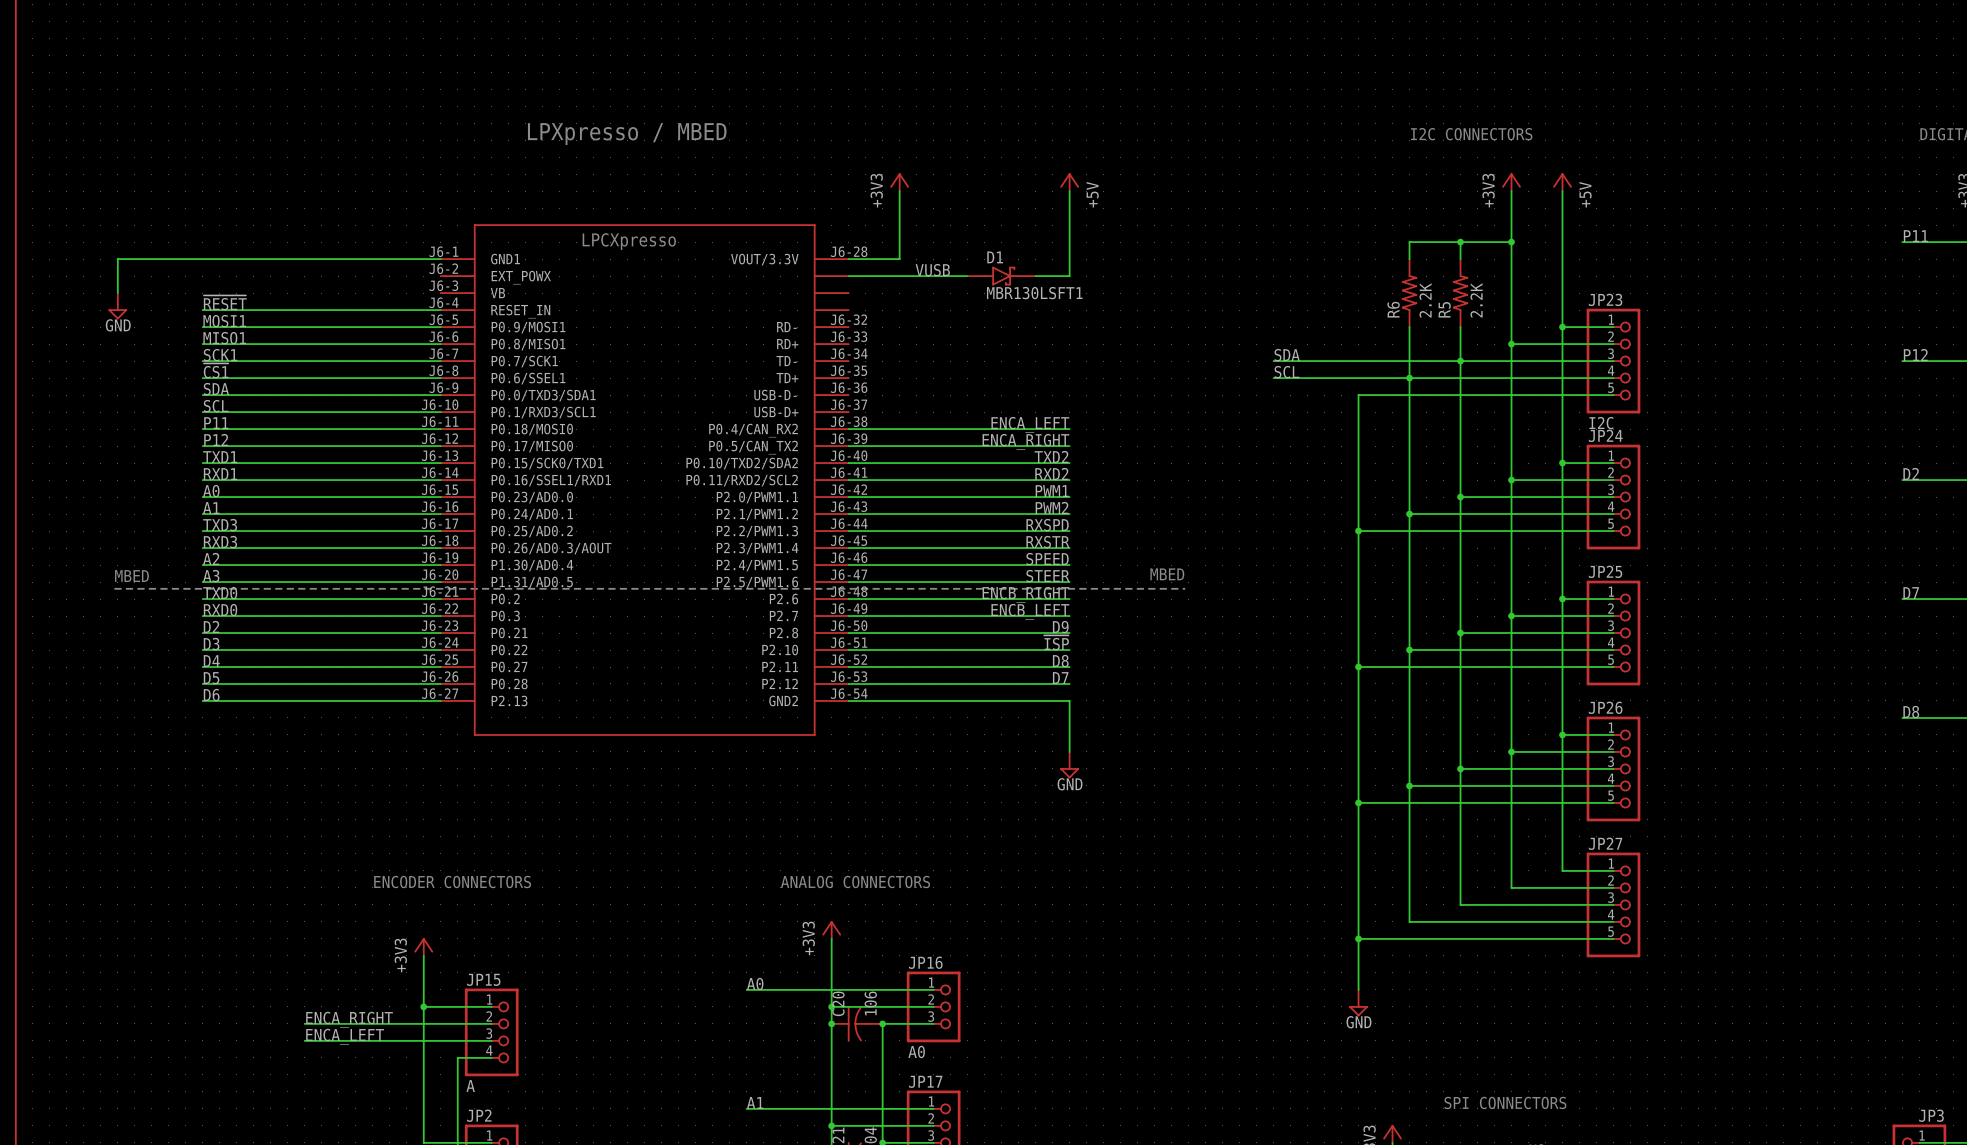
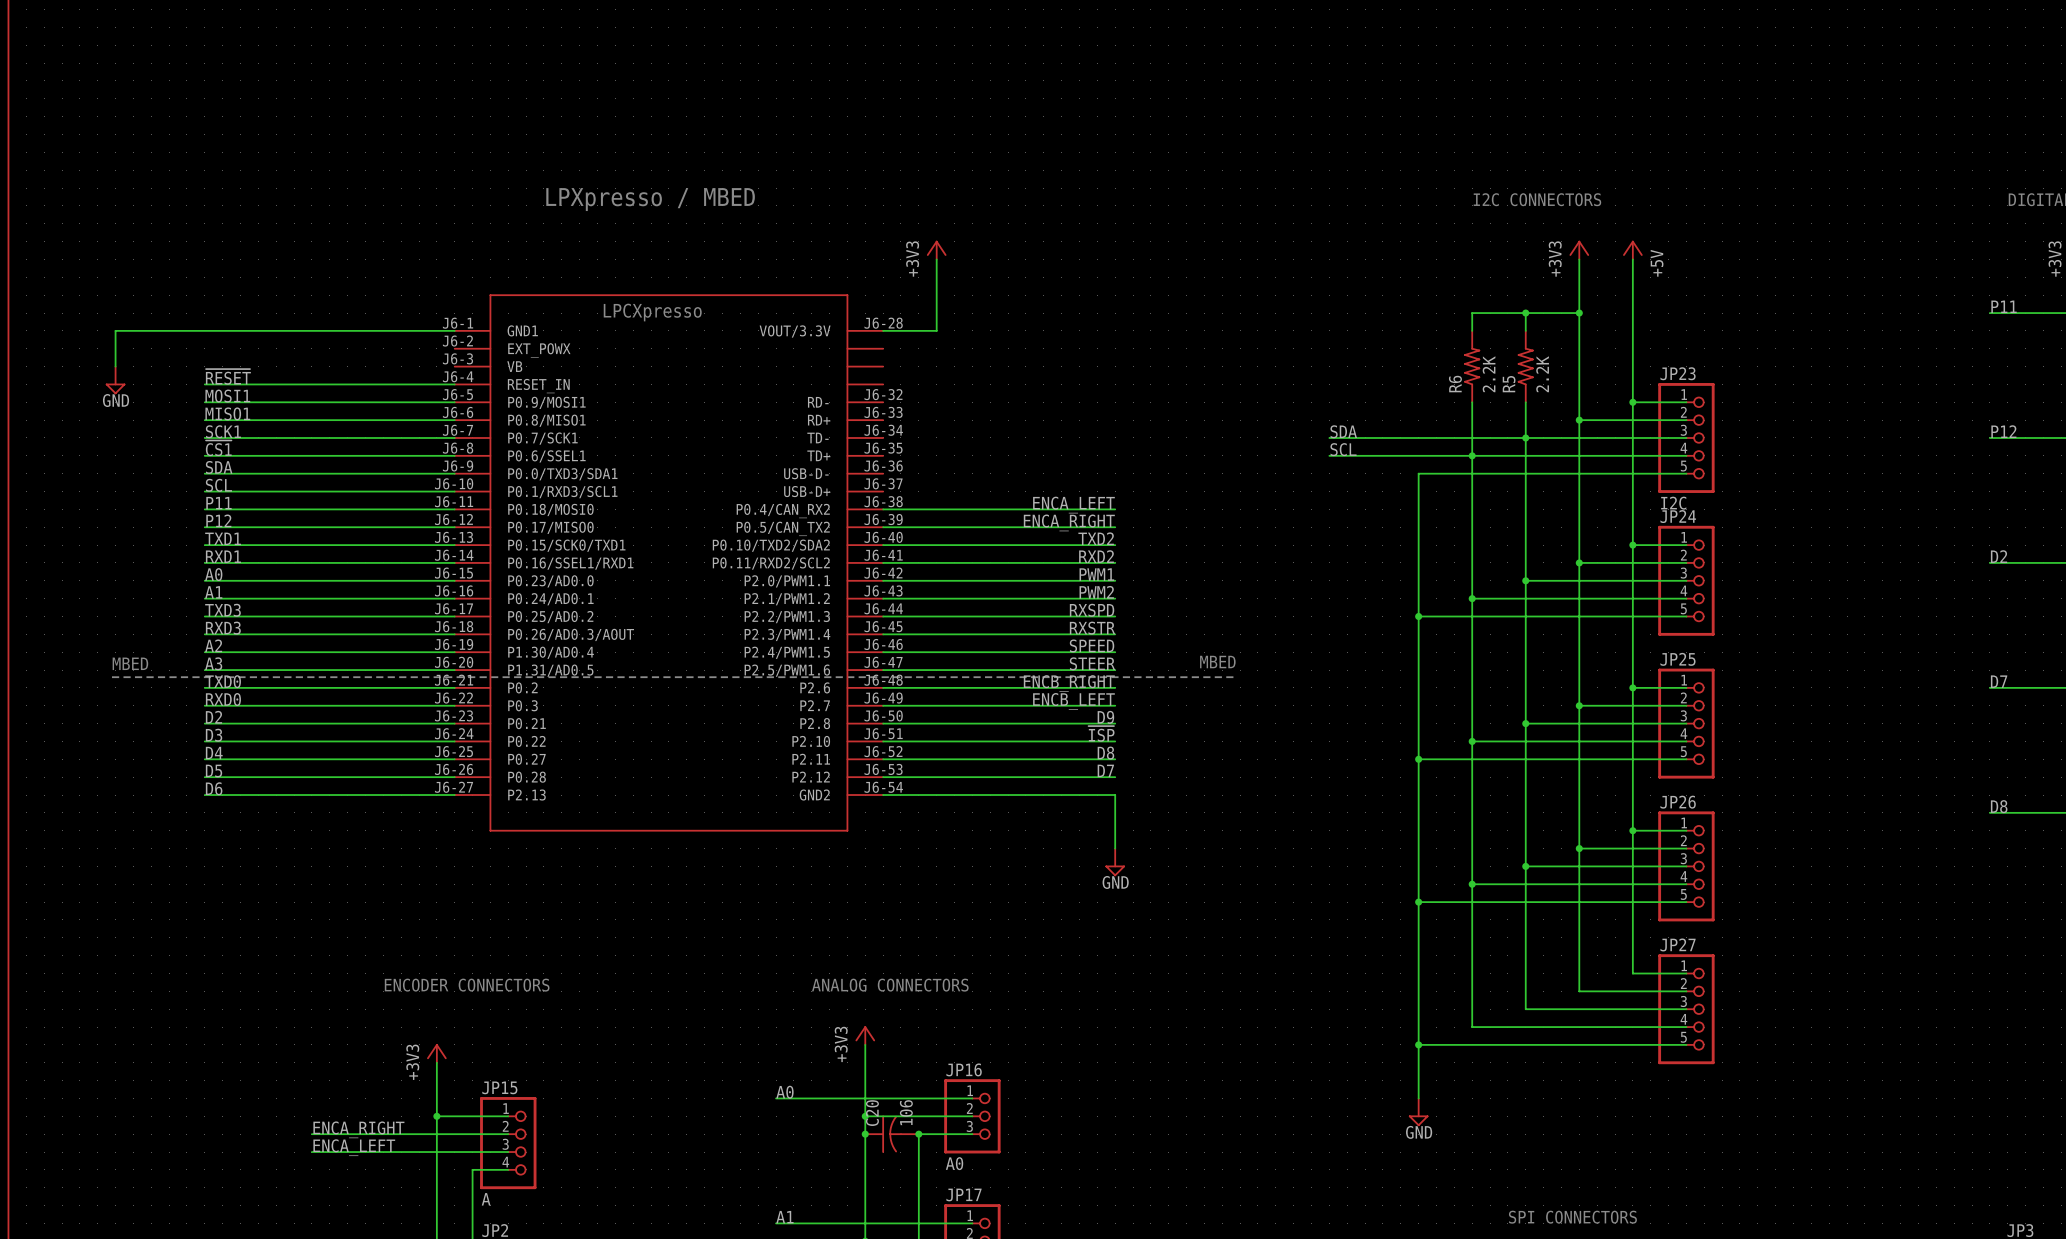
power symbol: +5V (1069, 182) -> none
wire: (1069, 191) (1069, 276) (1035, 276) -> none
label: VUSB (932, 270) -> none
wire: (848, 276) (967, 276) -> none
D1: MBR130LSFT1 (1001, 276) -> none

